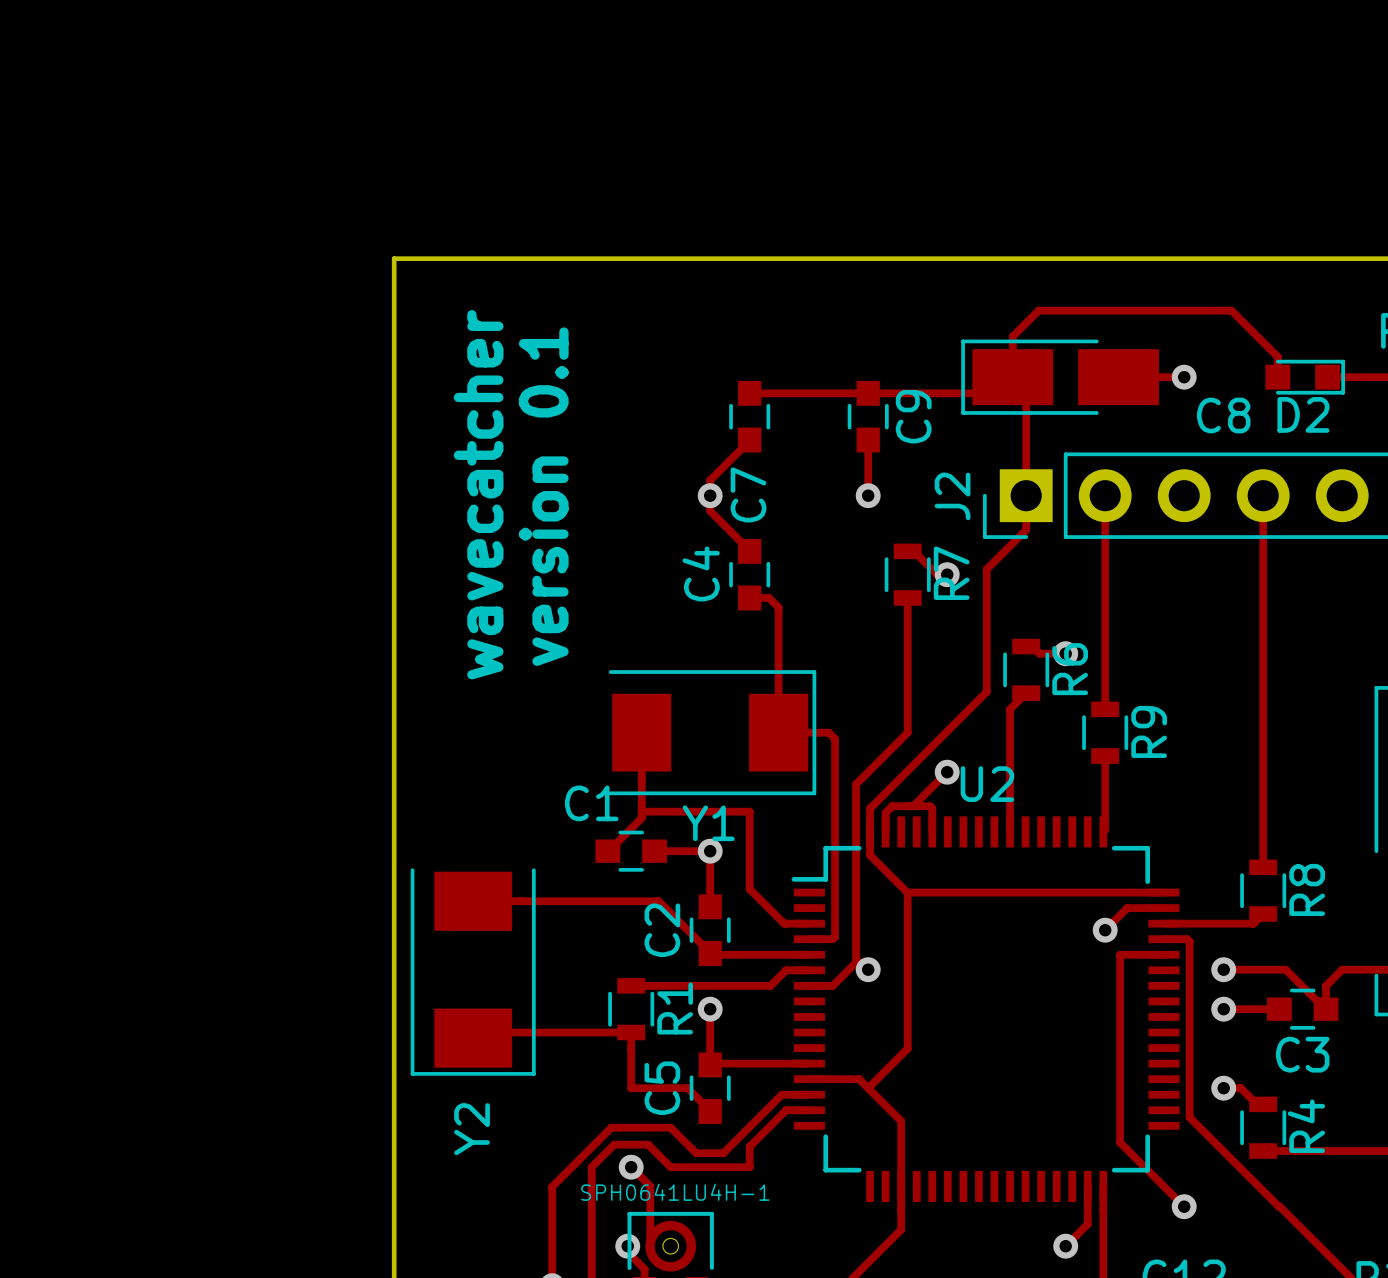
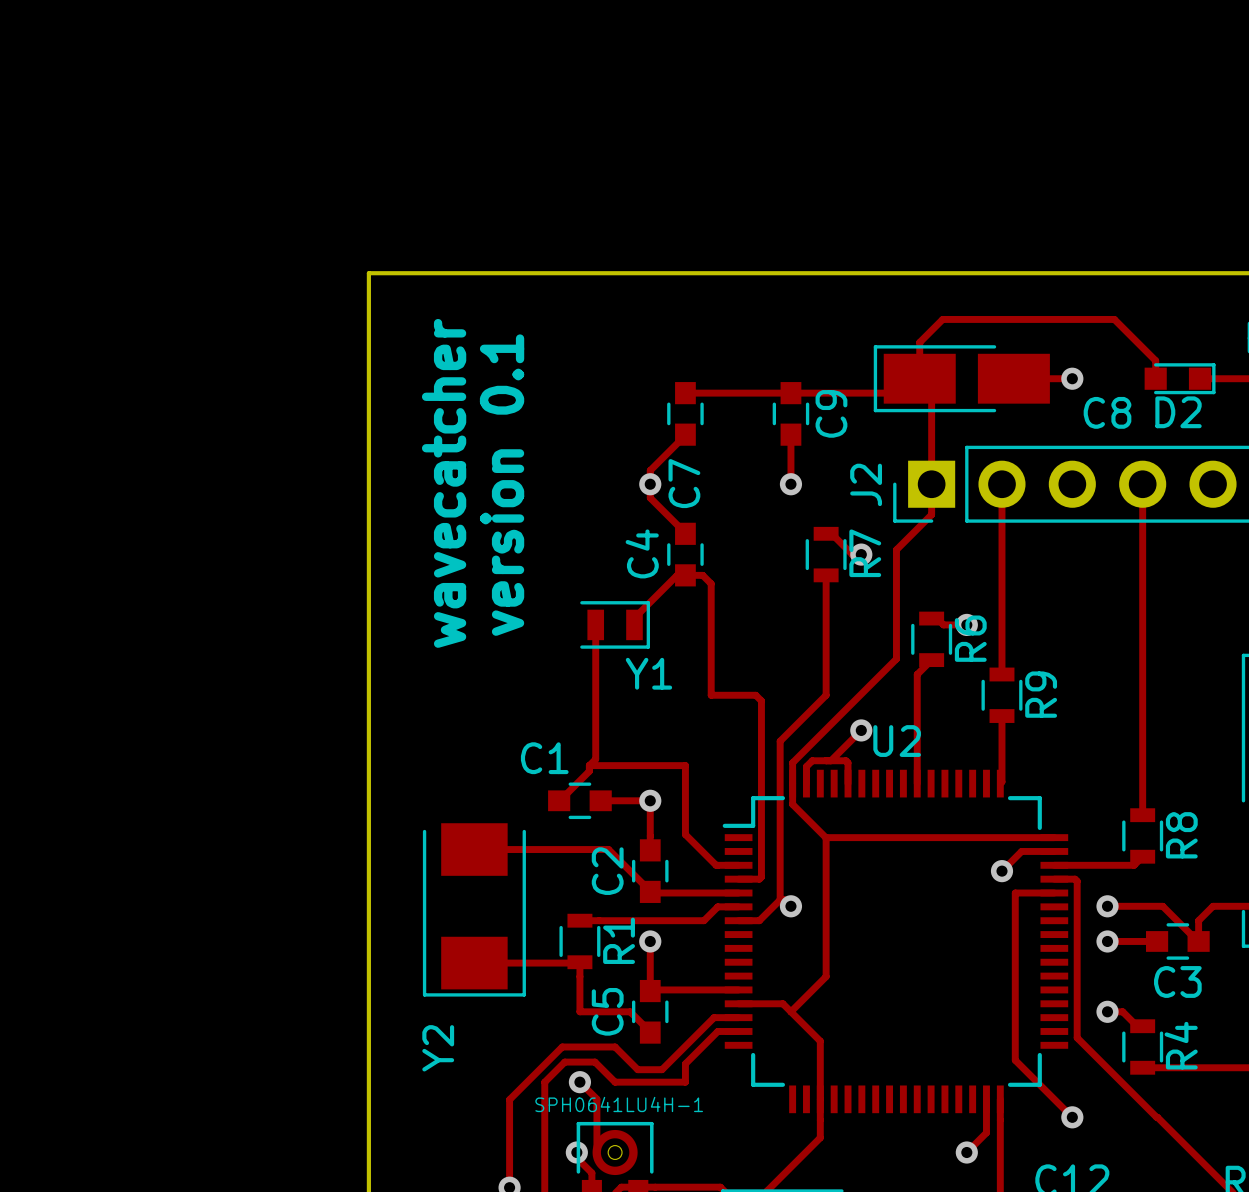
track: none -> (685, 575) (677, 575) (634, 618) (634, 624)
Y1 footprint: [608, 670, 817, 796] -> [580, 601, 650, 649]
track: (641, 732) (641, 811) -> (595, 624) (595, 759) (589, 765)
Y2 footprint: [410, 868, 536, 1076] -> [422, 823, 526, 997]
track: (473, 901) (658, 901) (663, 905) -> (474, 849) (608, 849)
track: (631, 1032) (478, 1032) (473, 1038) -> (579, 962) (474, 963)

